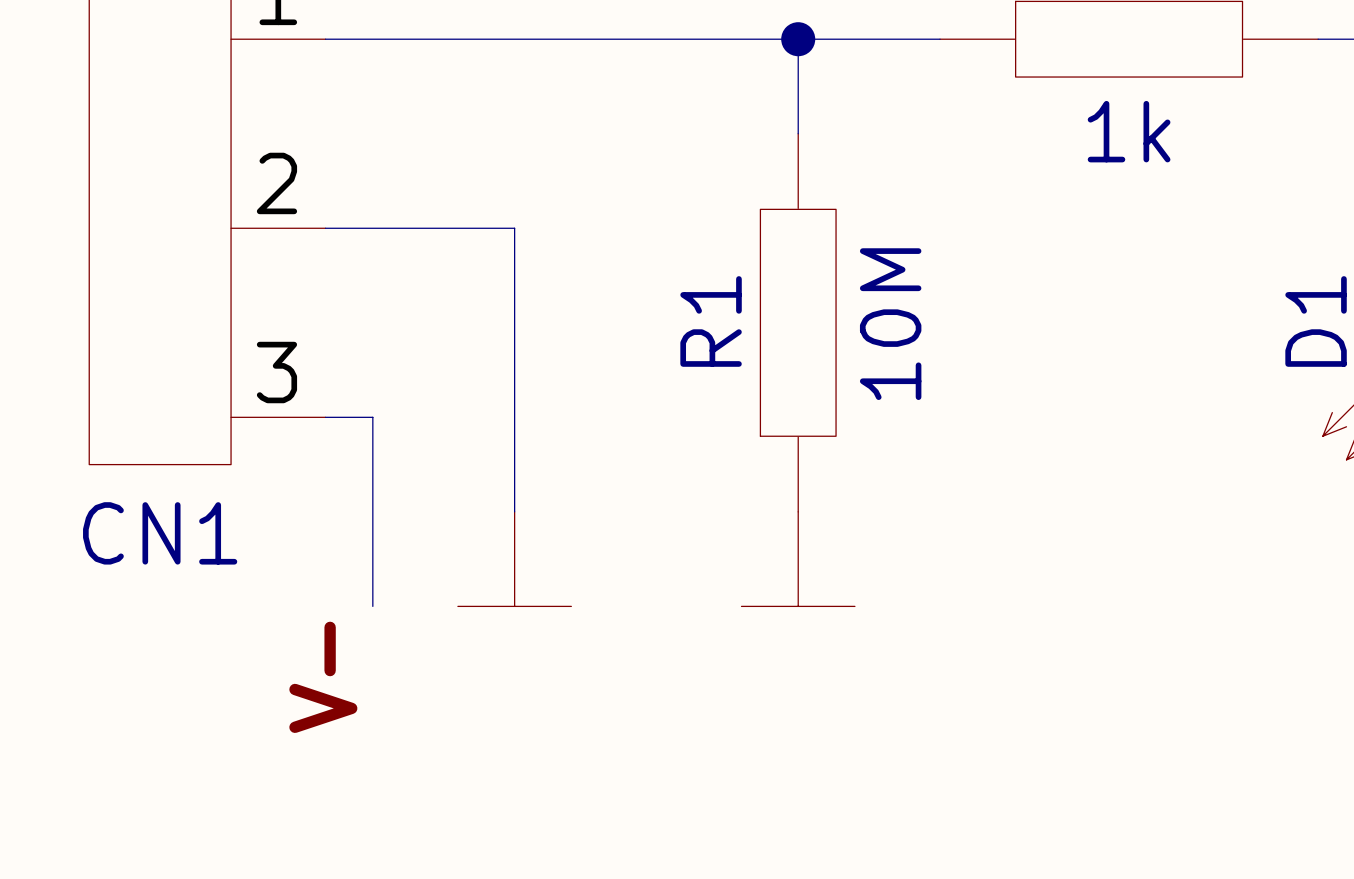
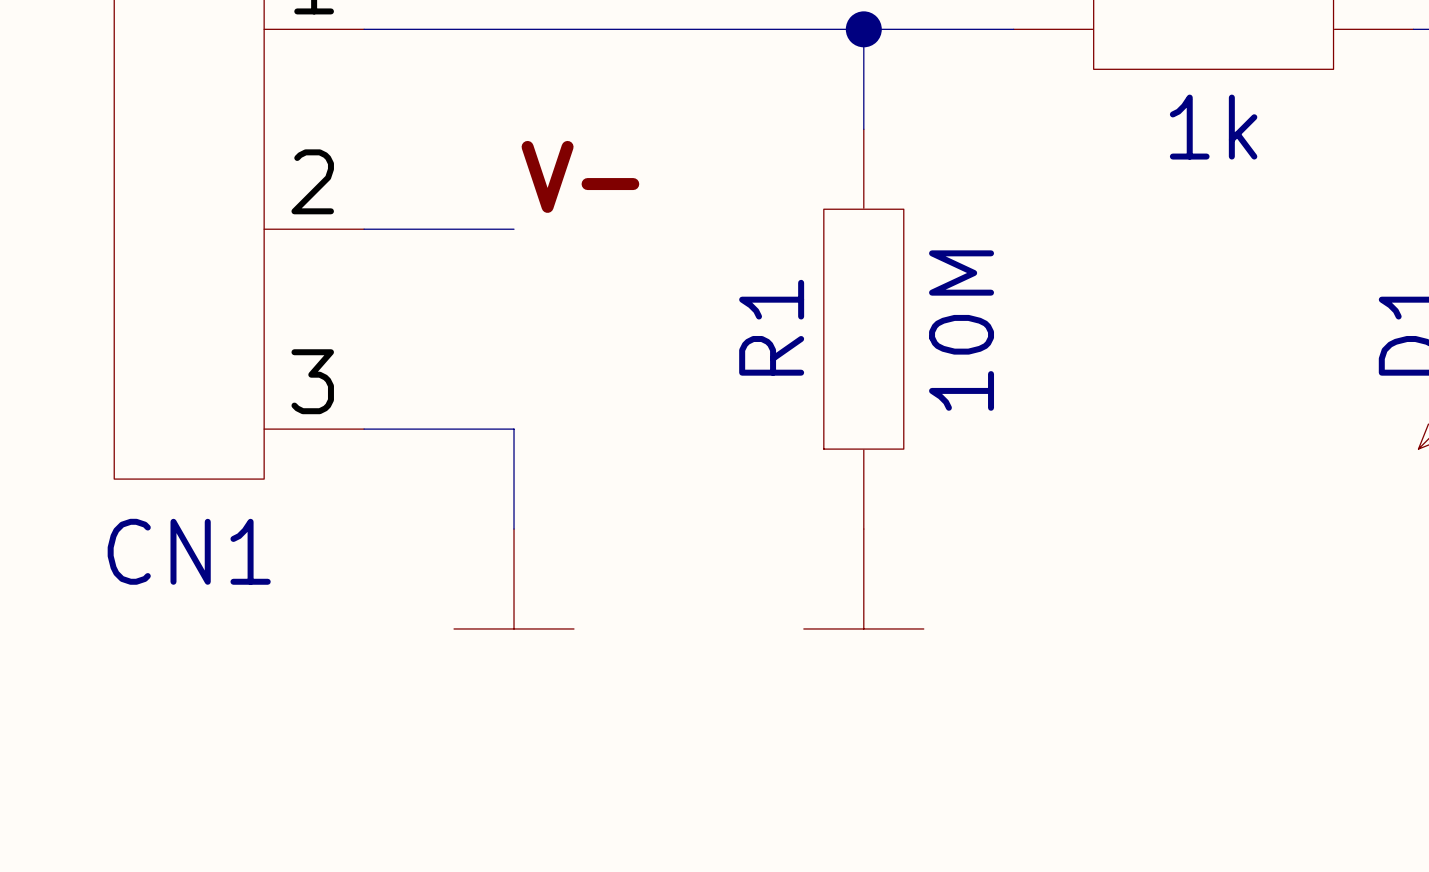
wire: (467, 228) (514, 228) (514, 511) -> none
wire: (372, 417) (372, 606) -> (414, 429) (514, 429) (514, 529)
power symbol position: (514, 559) -> (514, 579)
label rotation: 0° (323, 677) -> 90° clockwise (580, 176)
label position: V- (323, 677) -> V- (580, 176)

